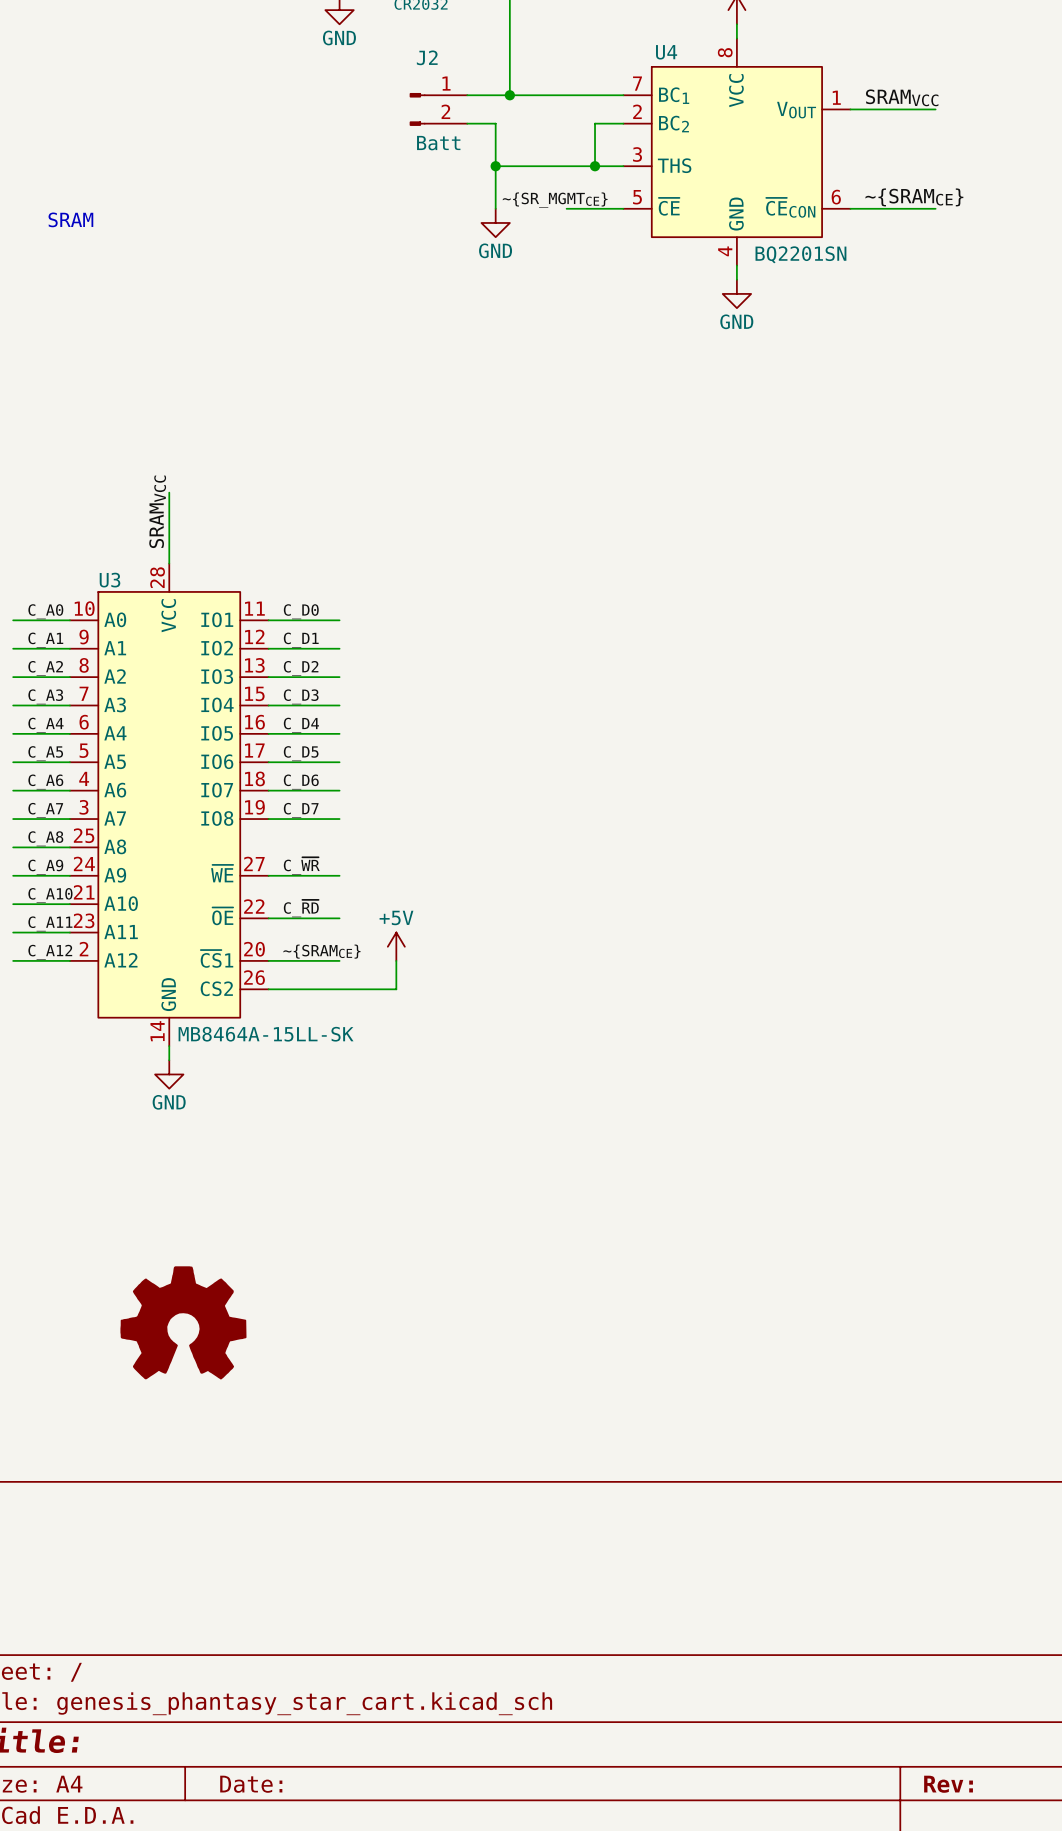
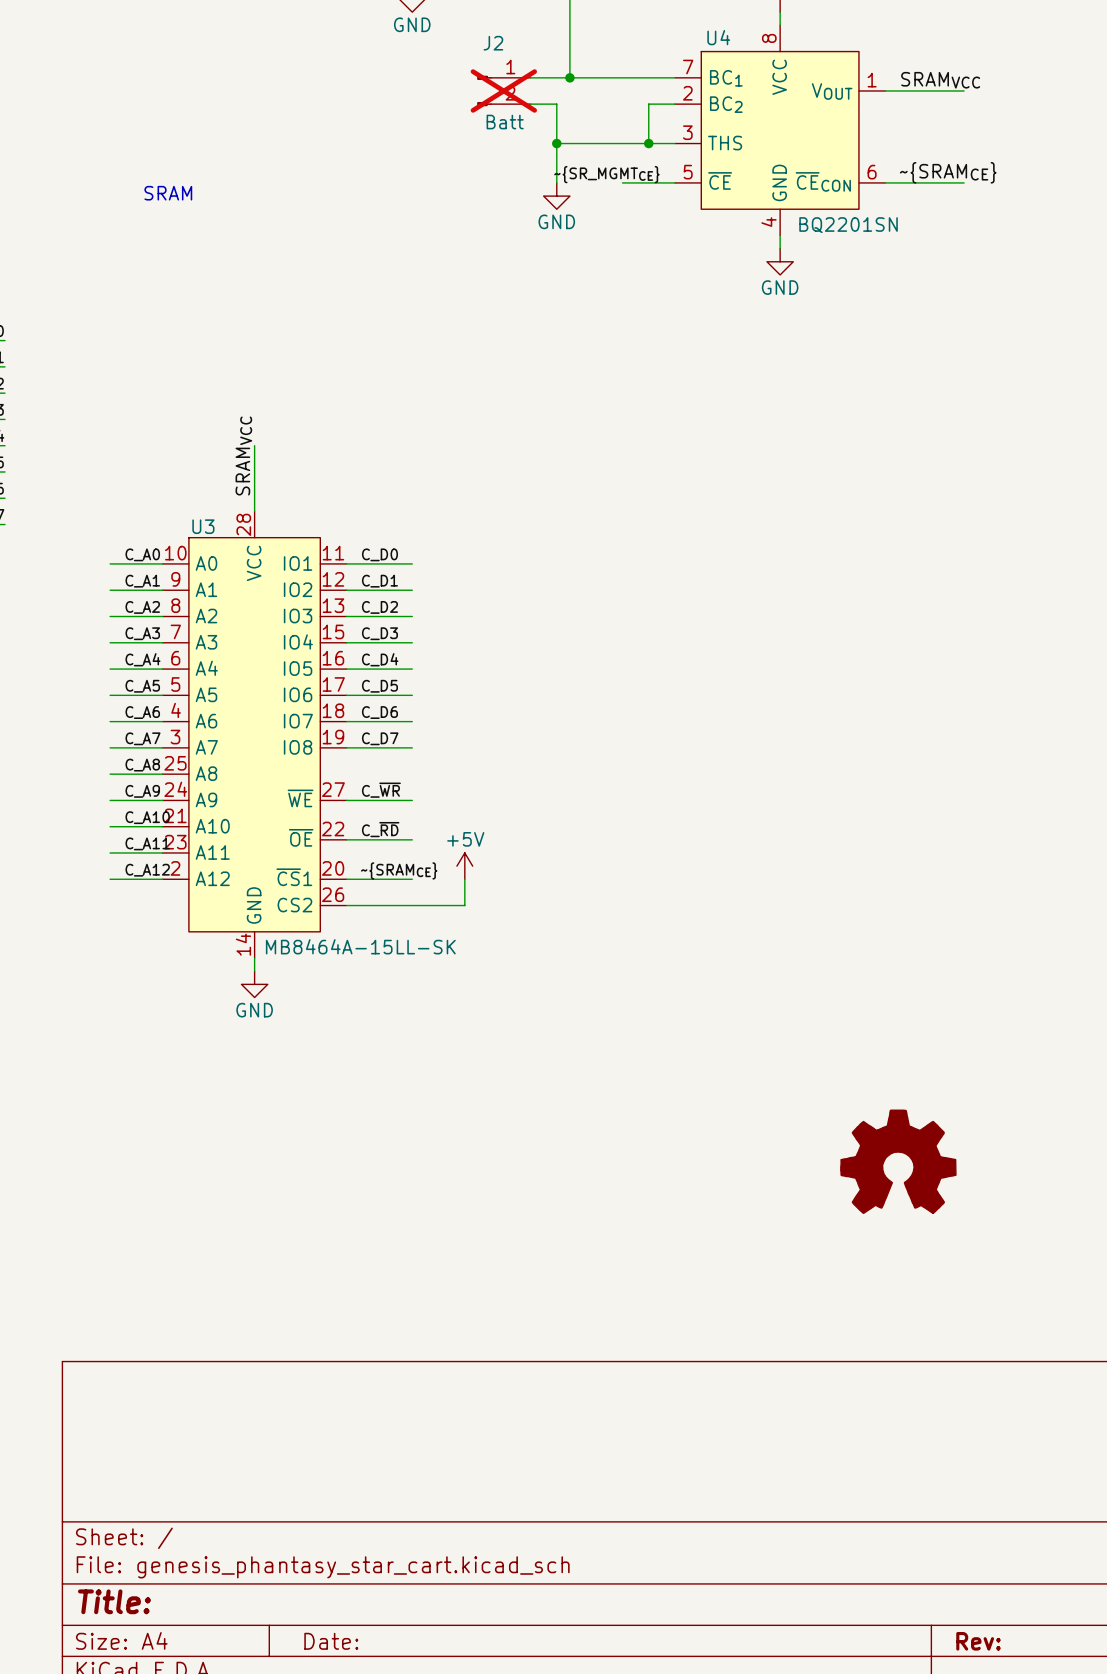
J2 do-not-place cross: none -> (503, 90)
power symbol: none -> (898, 1161)
power symbol: (183, 1322) -> none

